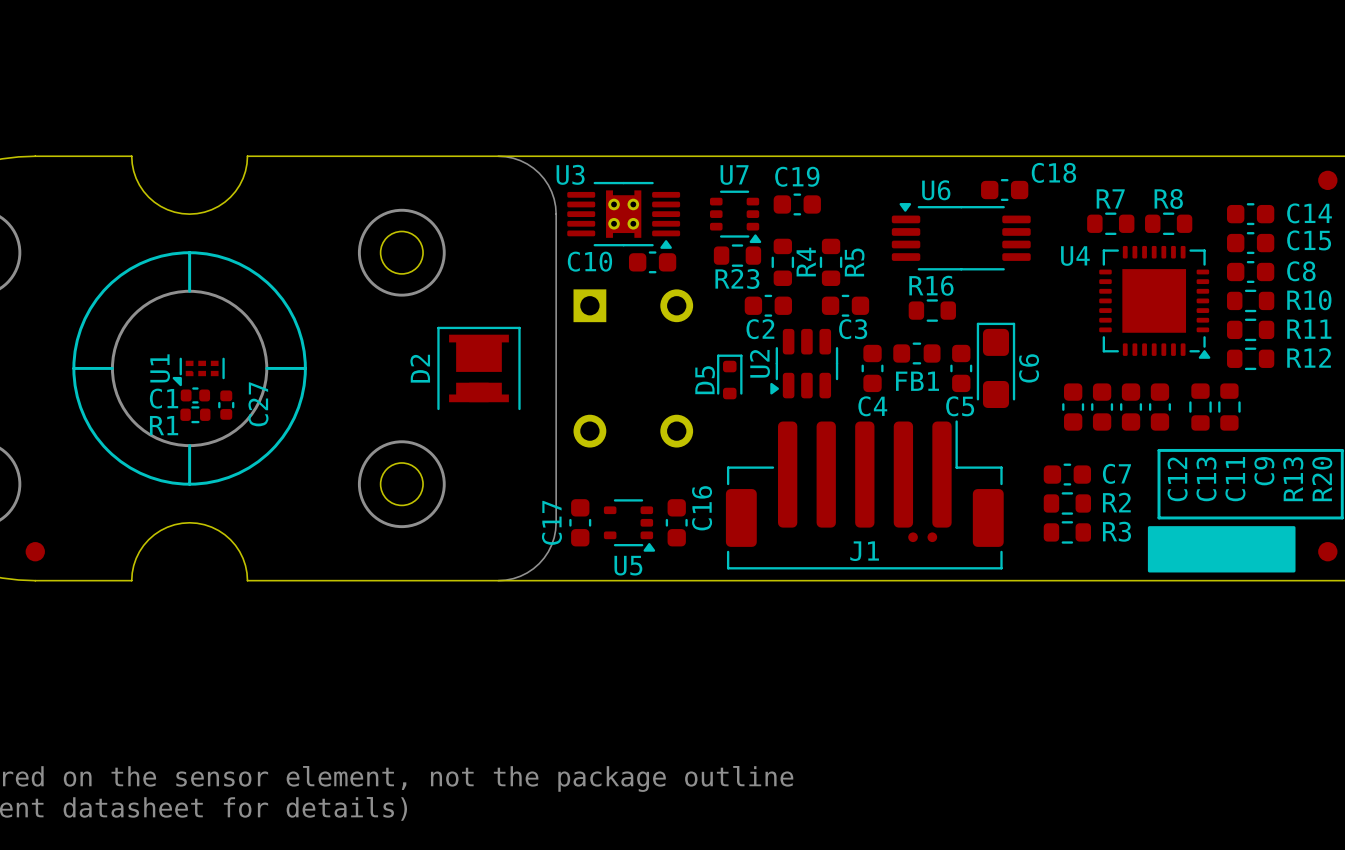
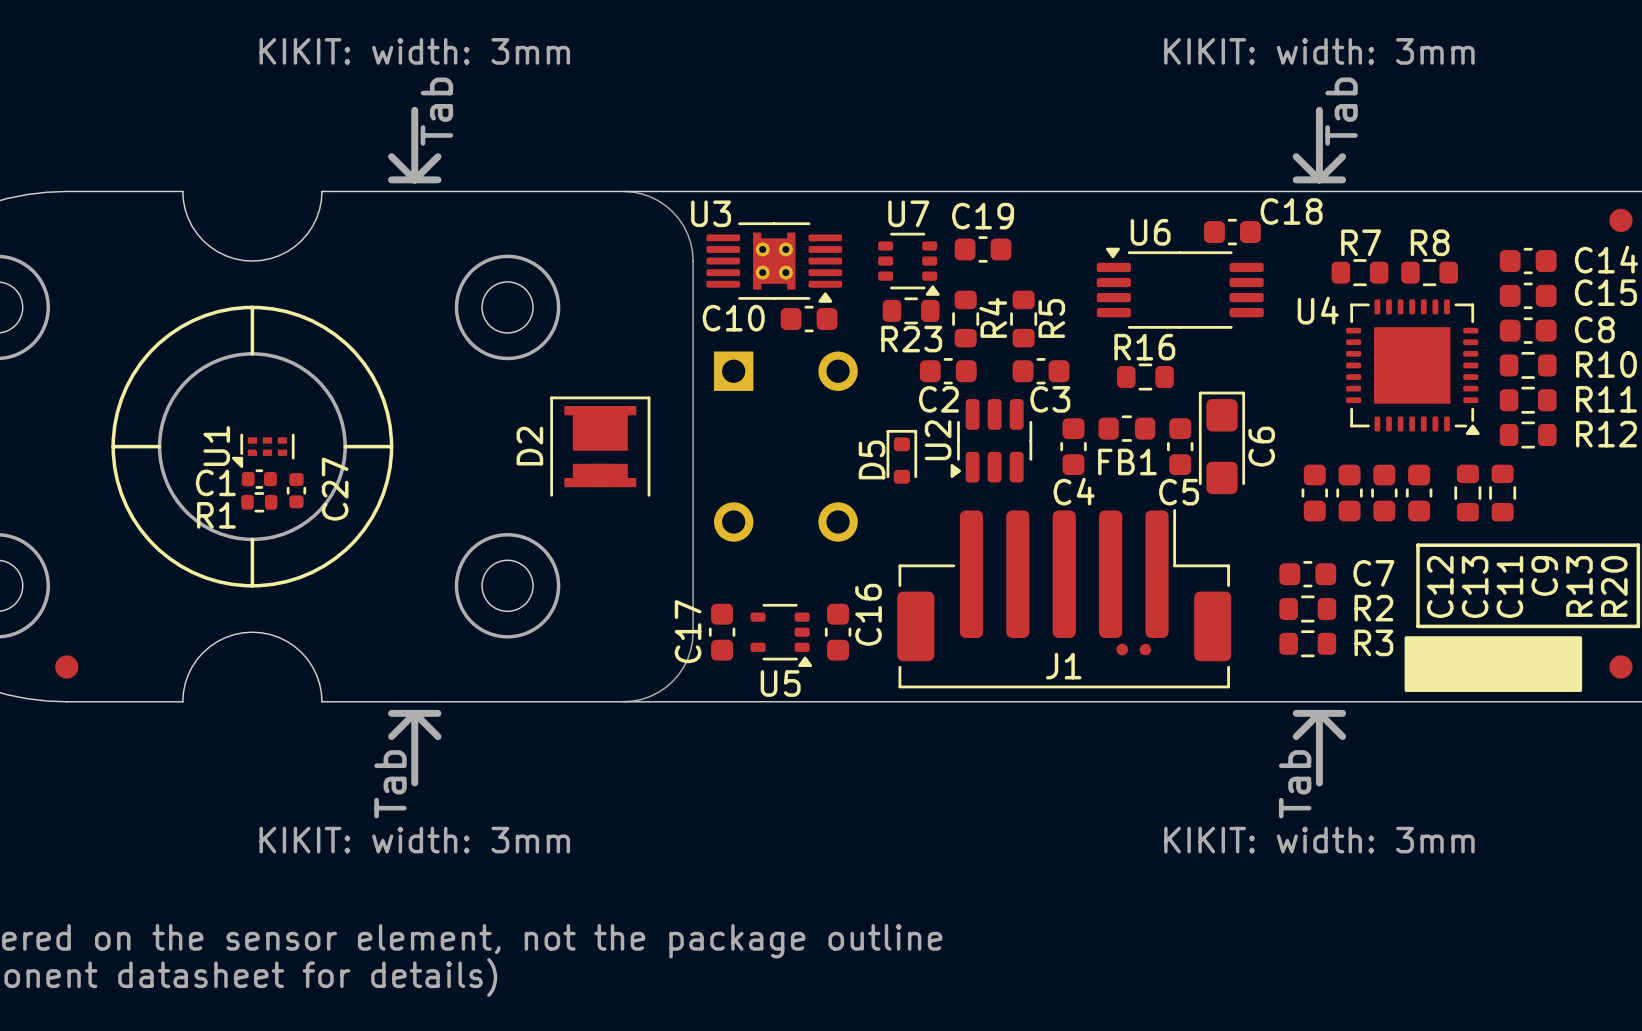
drawing: none -> [388, 106, 442, 184]
drawing: none -> [1292, 106, 1347, 184]
drawing: none -> [388, 709, 442, 787]
drawing: none -> [1292, 709, 1347, 787]

